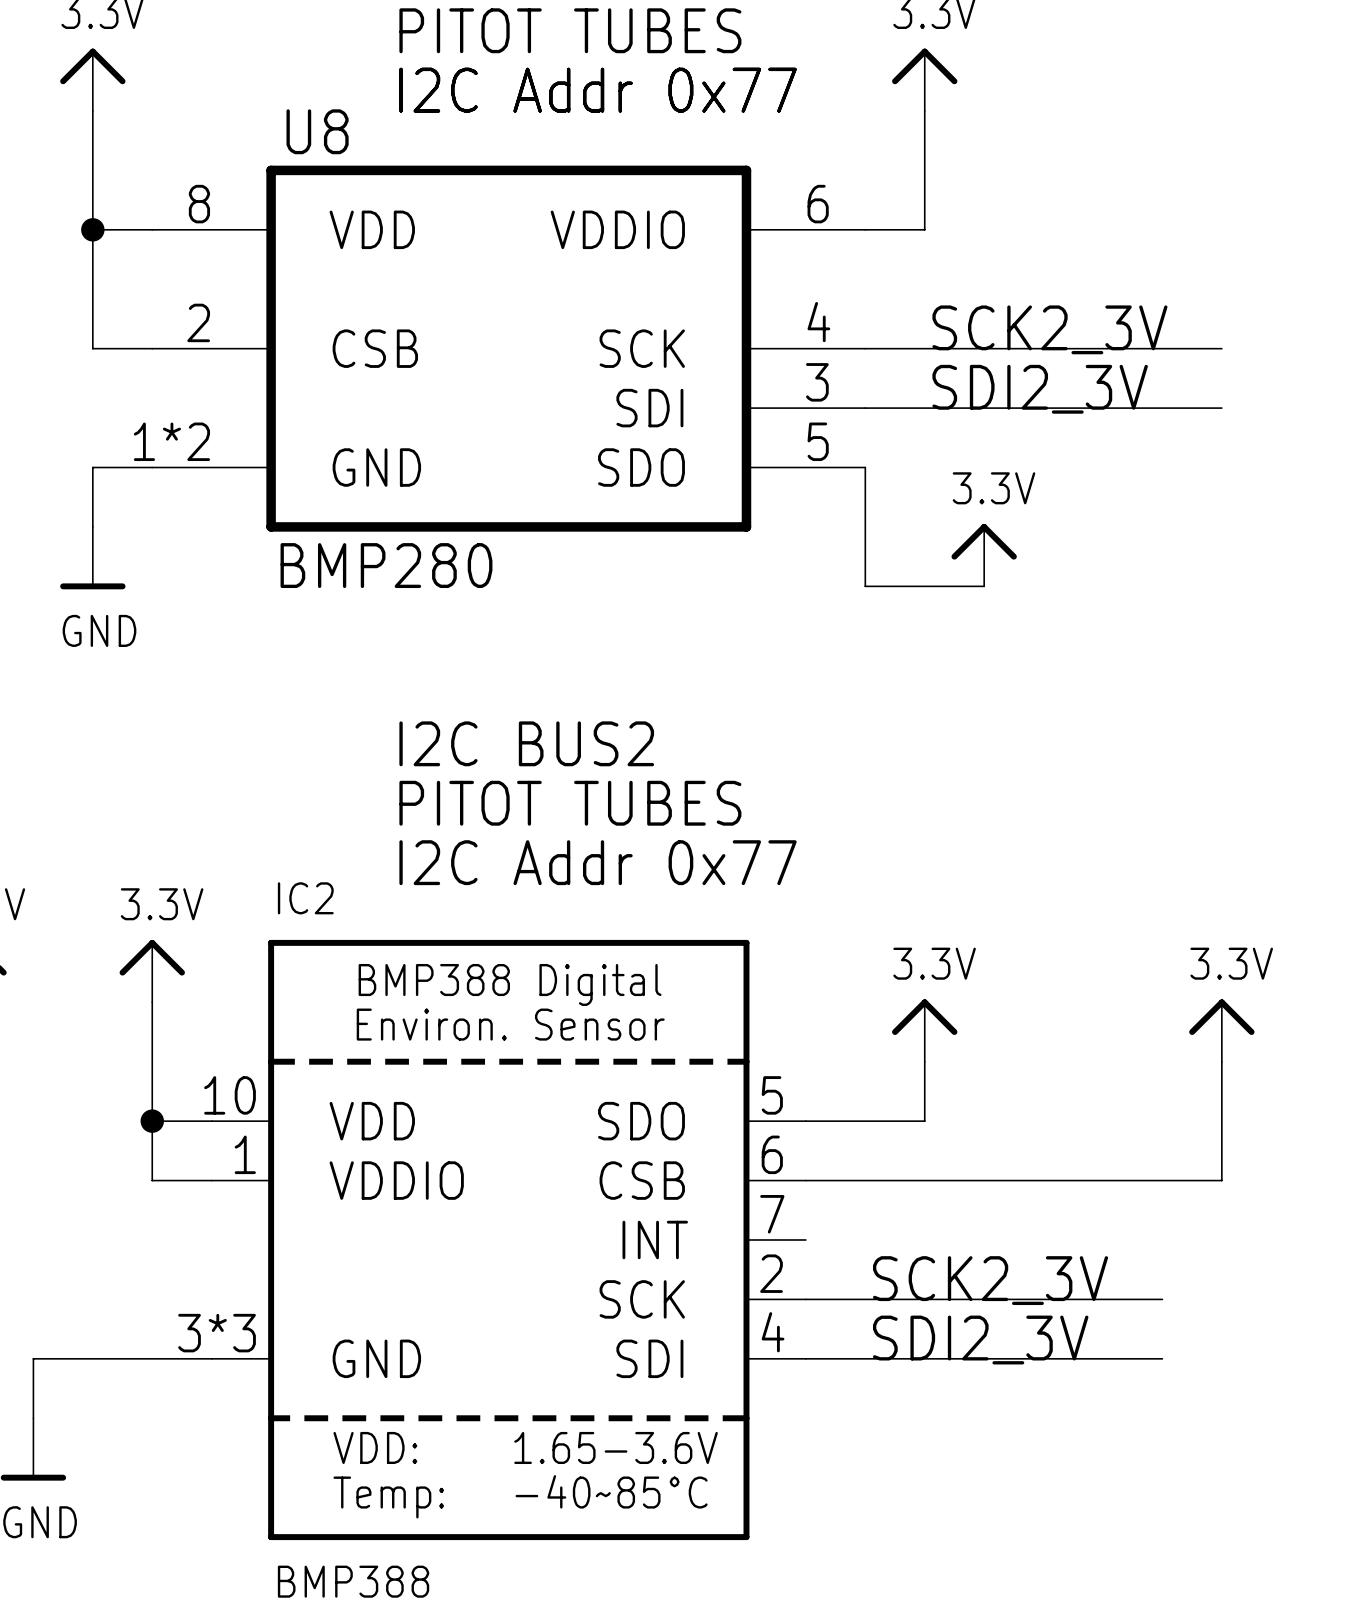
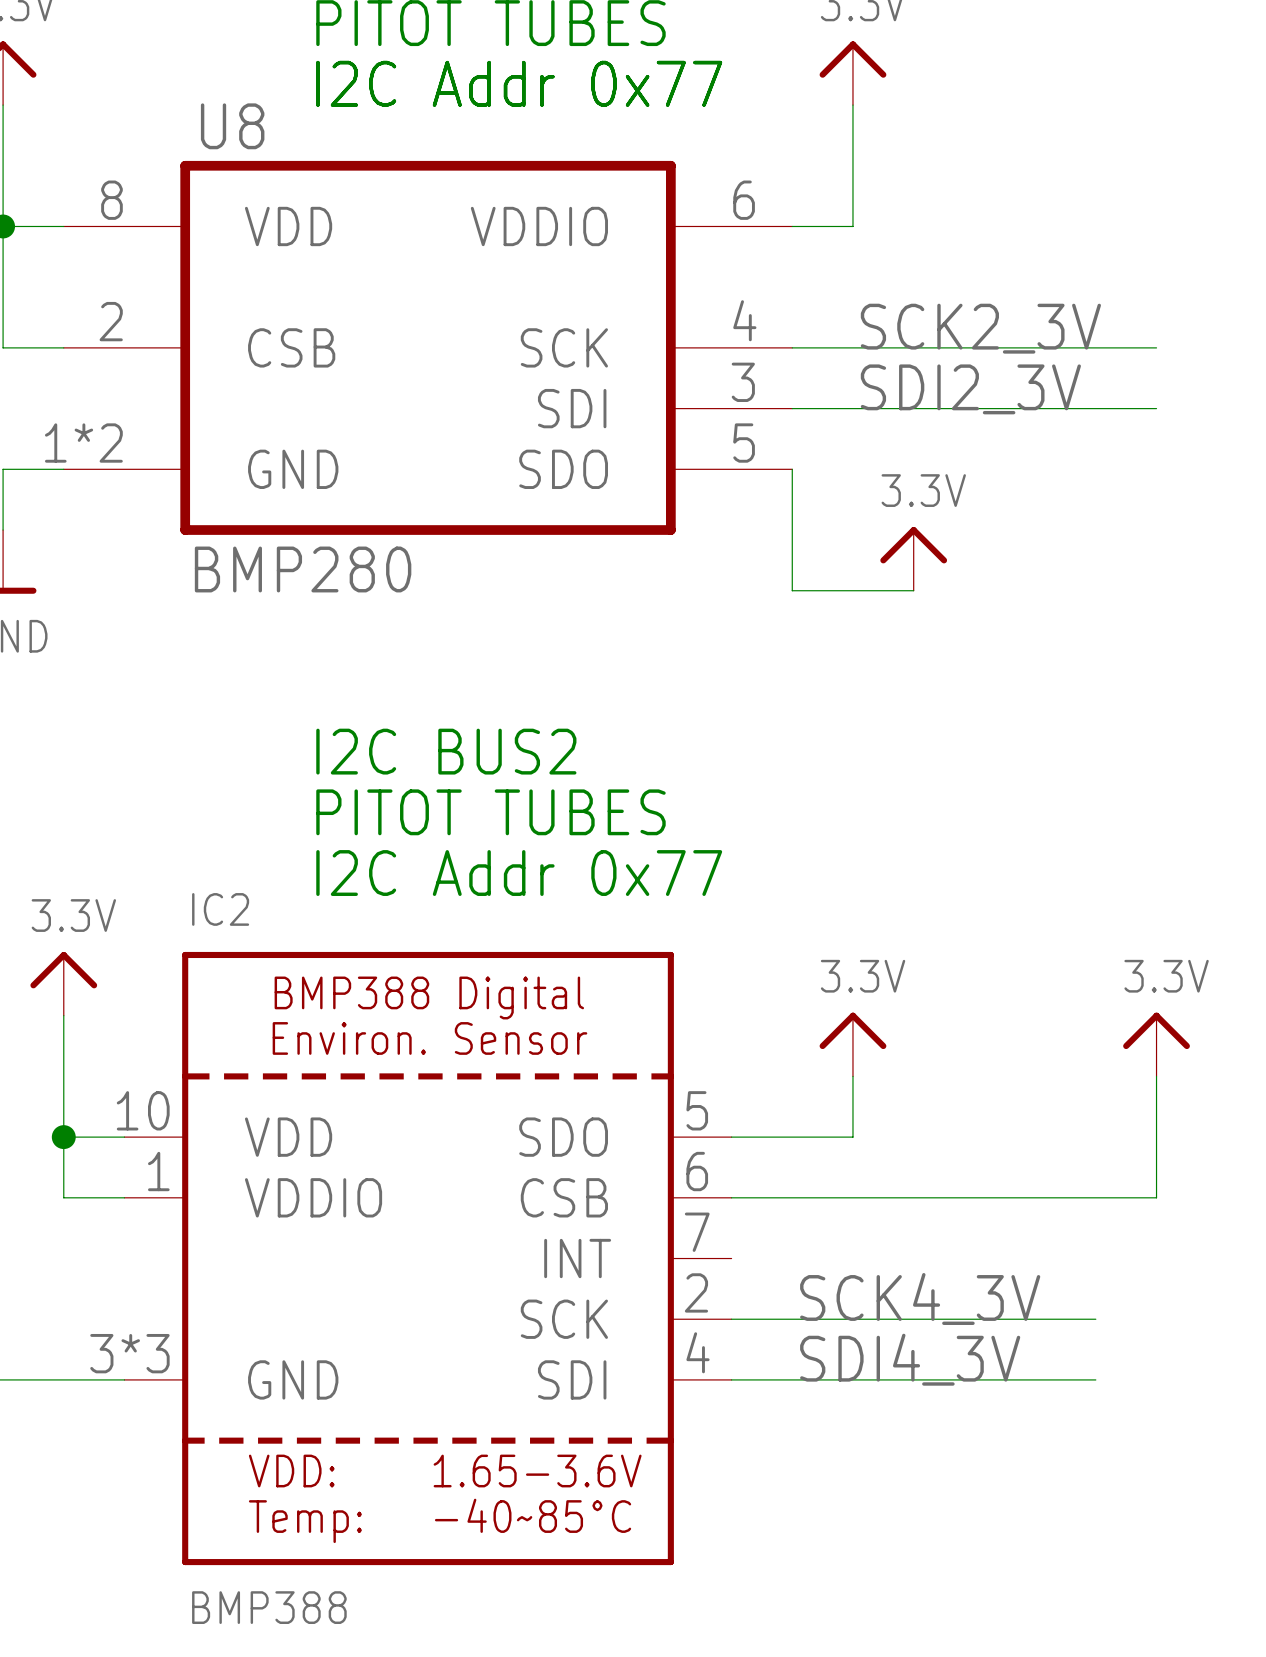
label: SCK2_3V (990, 1280) -> SCK4_3V (920, 1299)
label: SDI2_3V (980, 1340) -> SDI4_3V (910, 1359)

